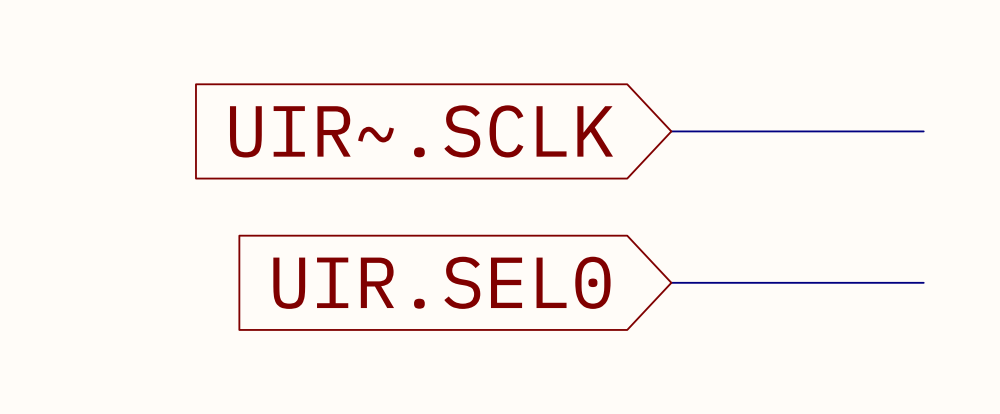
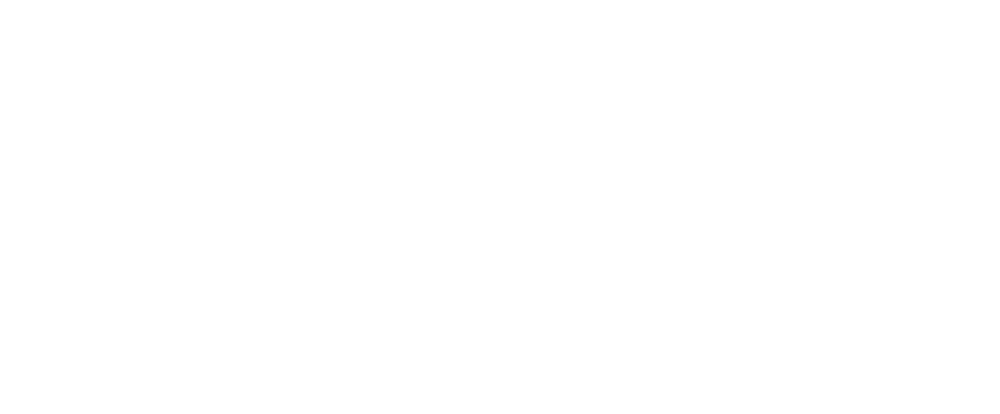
global label: UIR~.SCLK (421, 131) -> none
wire: (671, 131) (923, 131) -> none
global label: UIR.SEL0 (441, 282) -> none
wire: (671, 282) (923, 282) -> none

